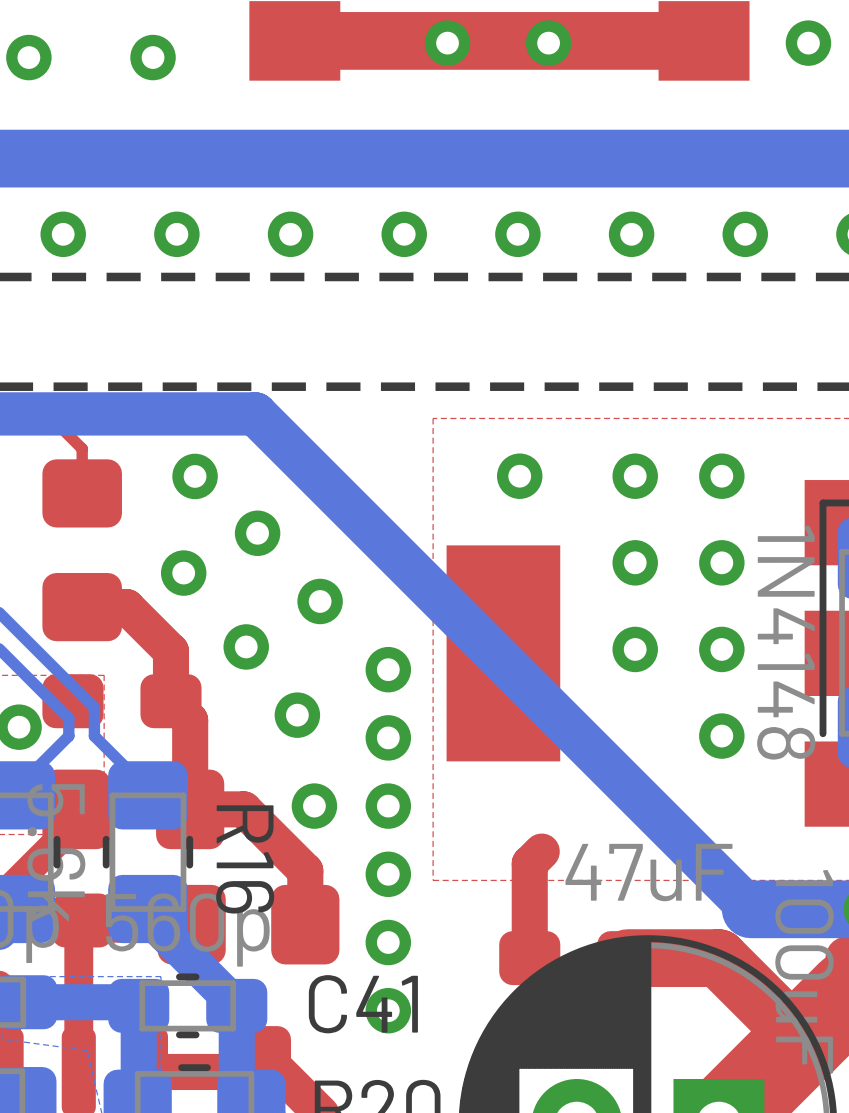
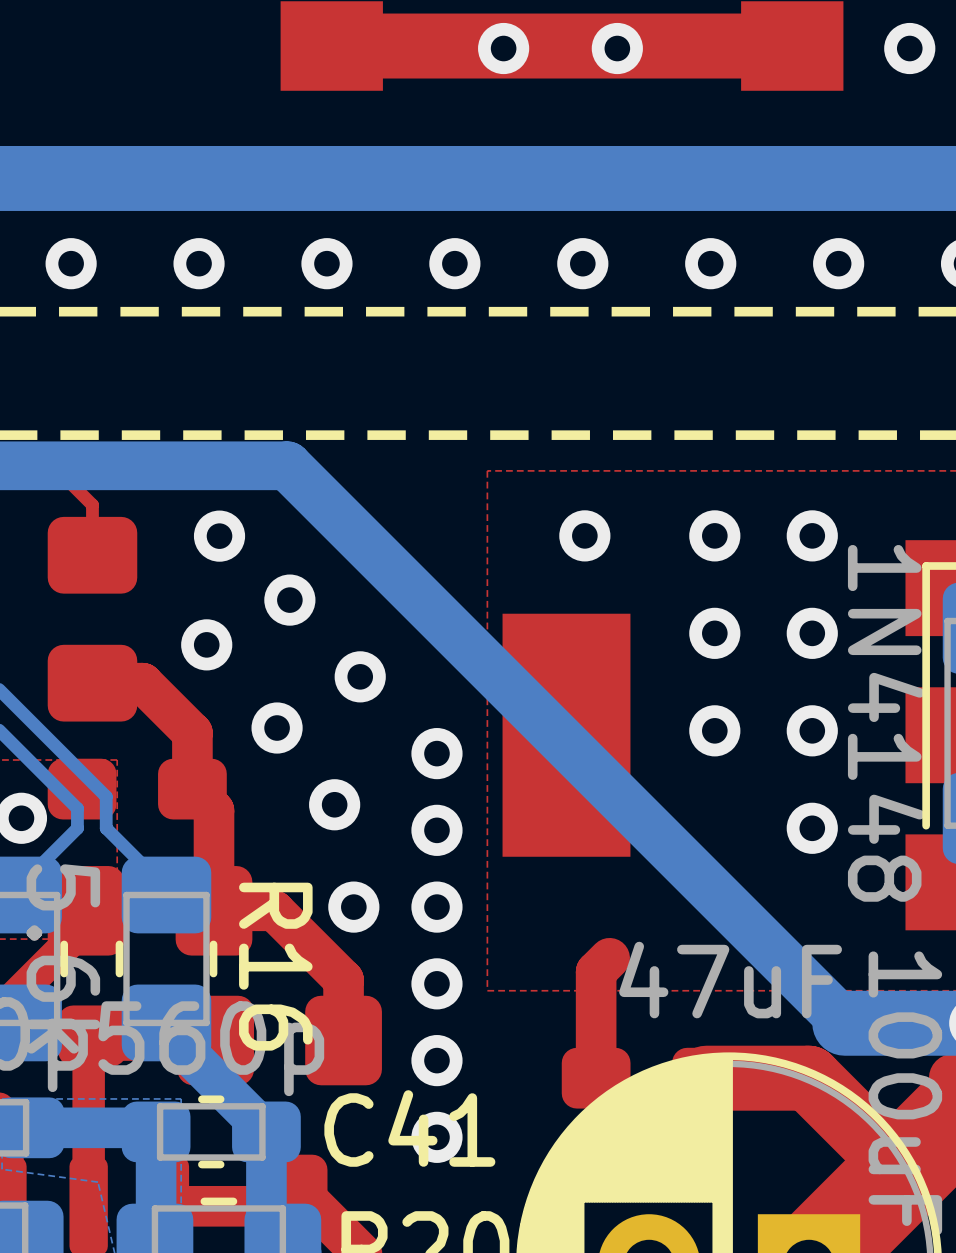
via: (28, 57) -> none
via: (153, 57) -> none

